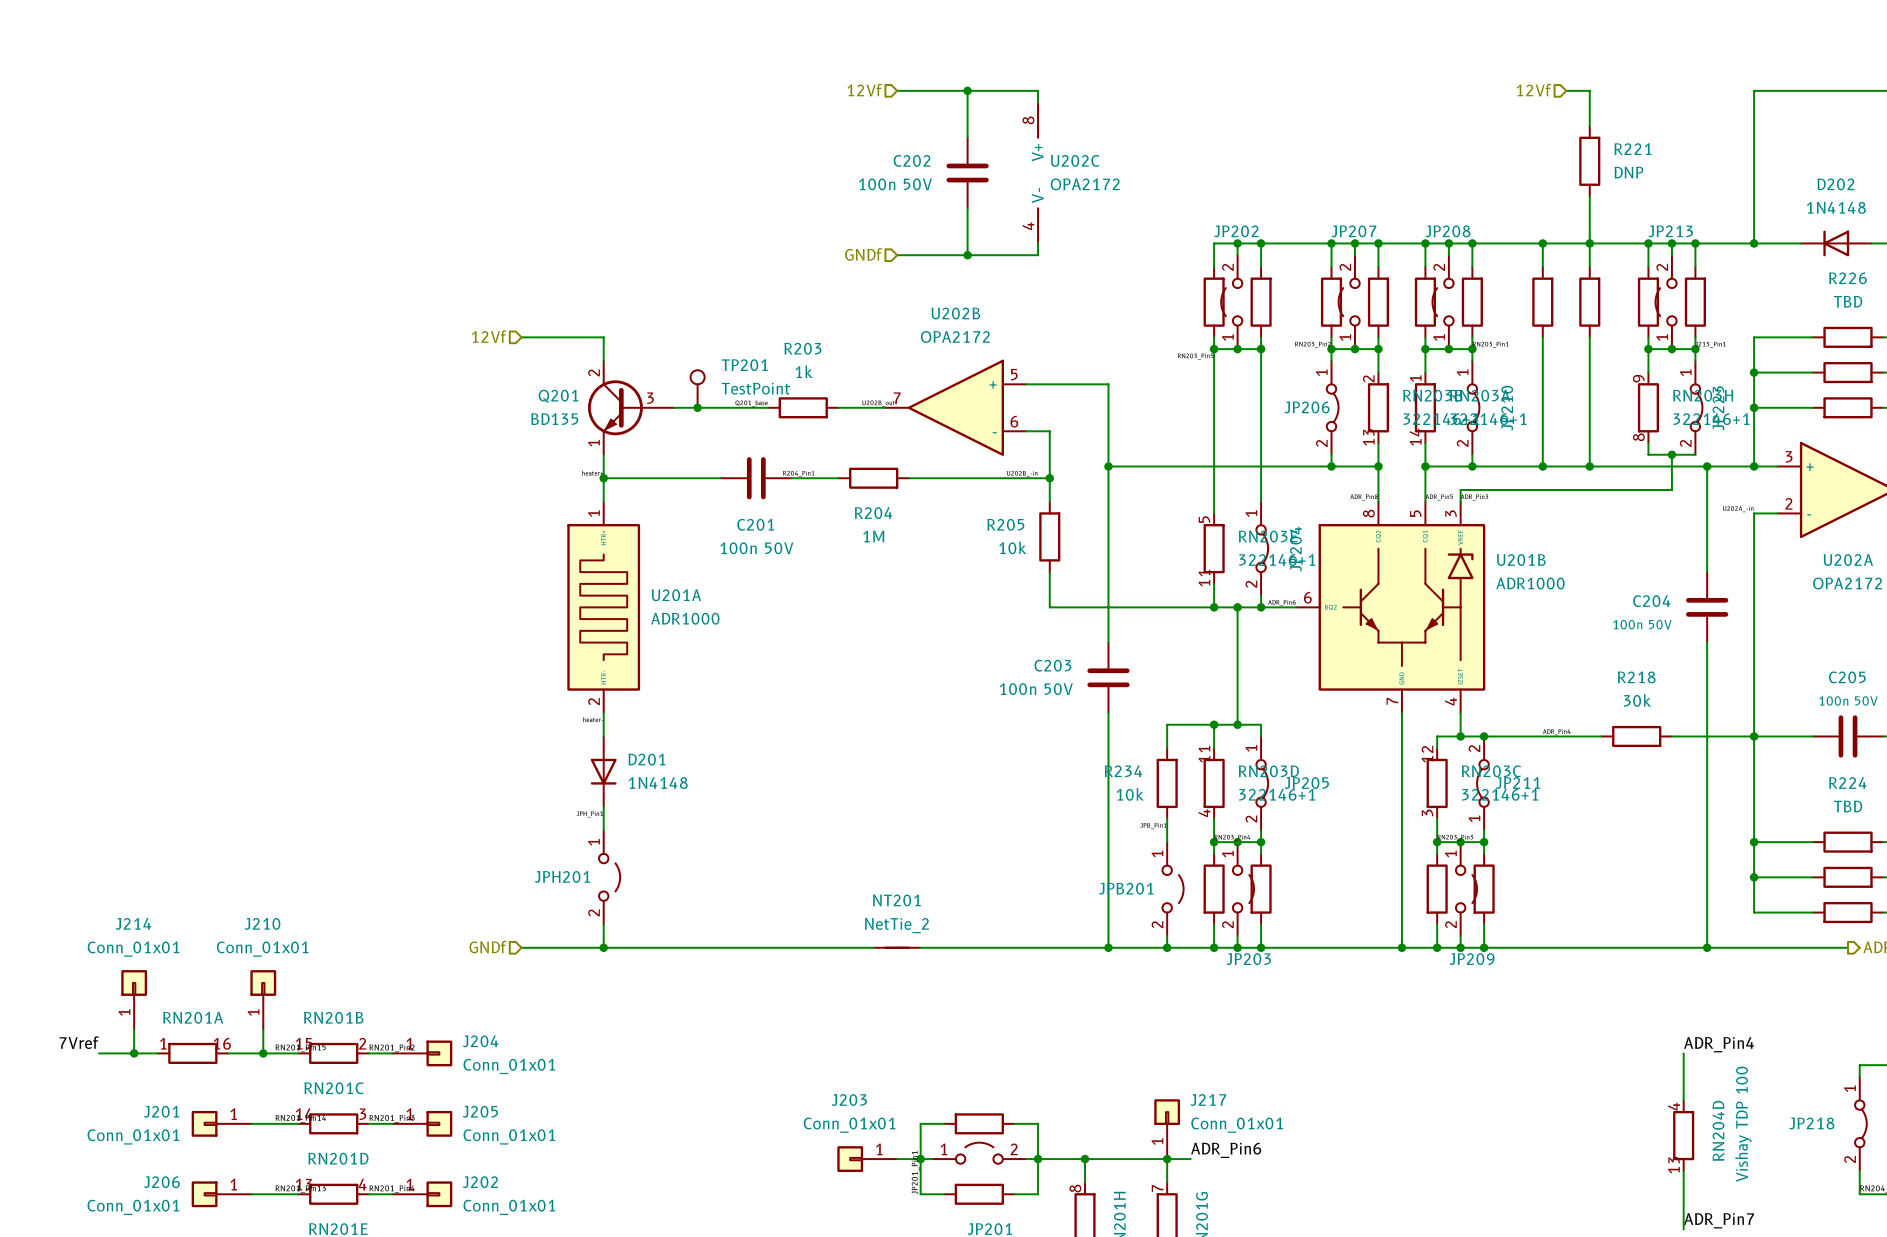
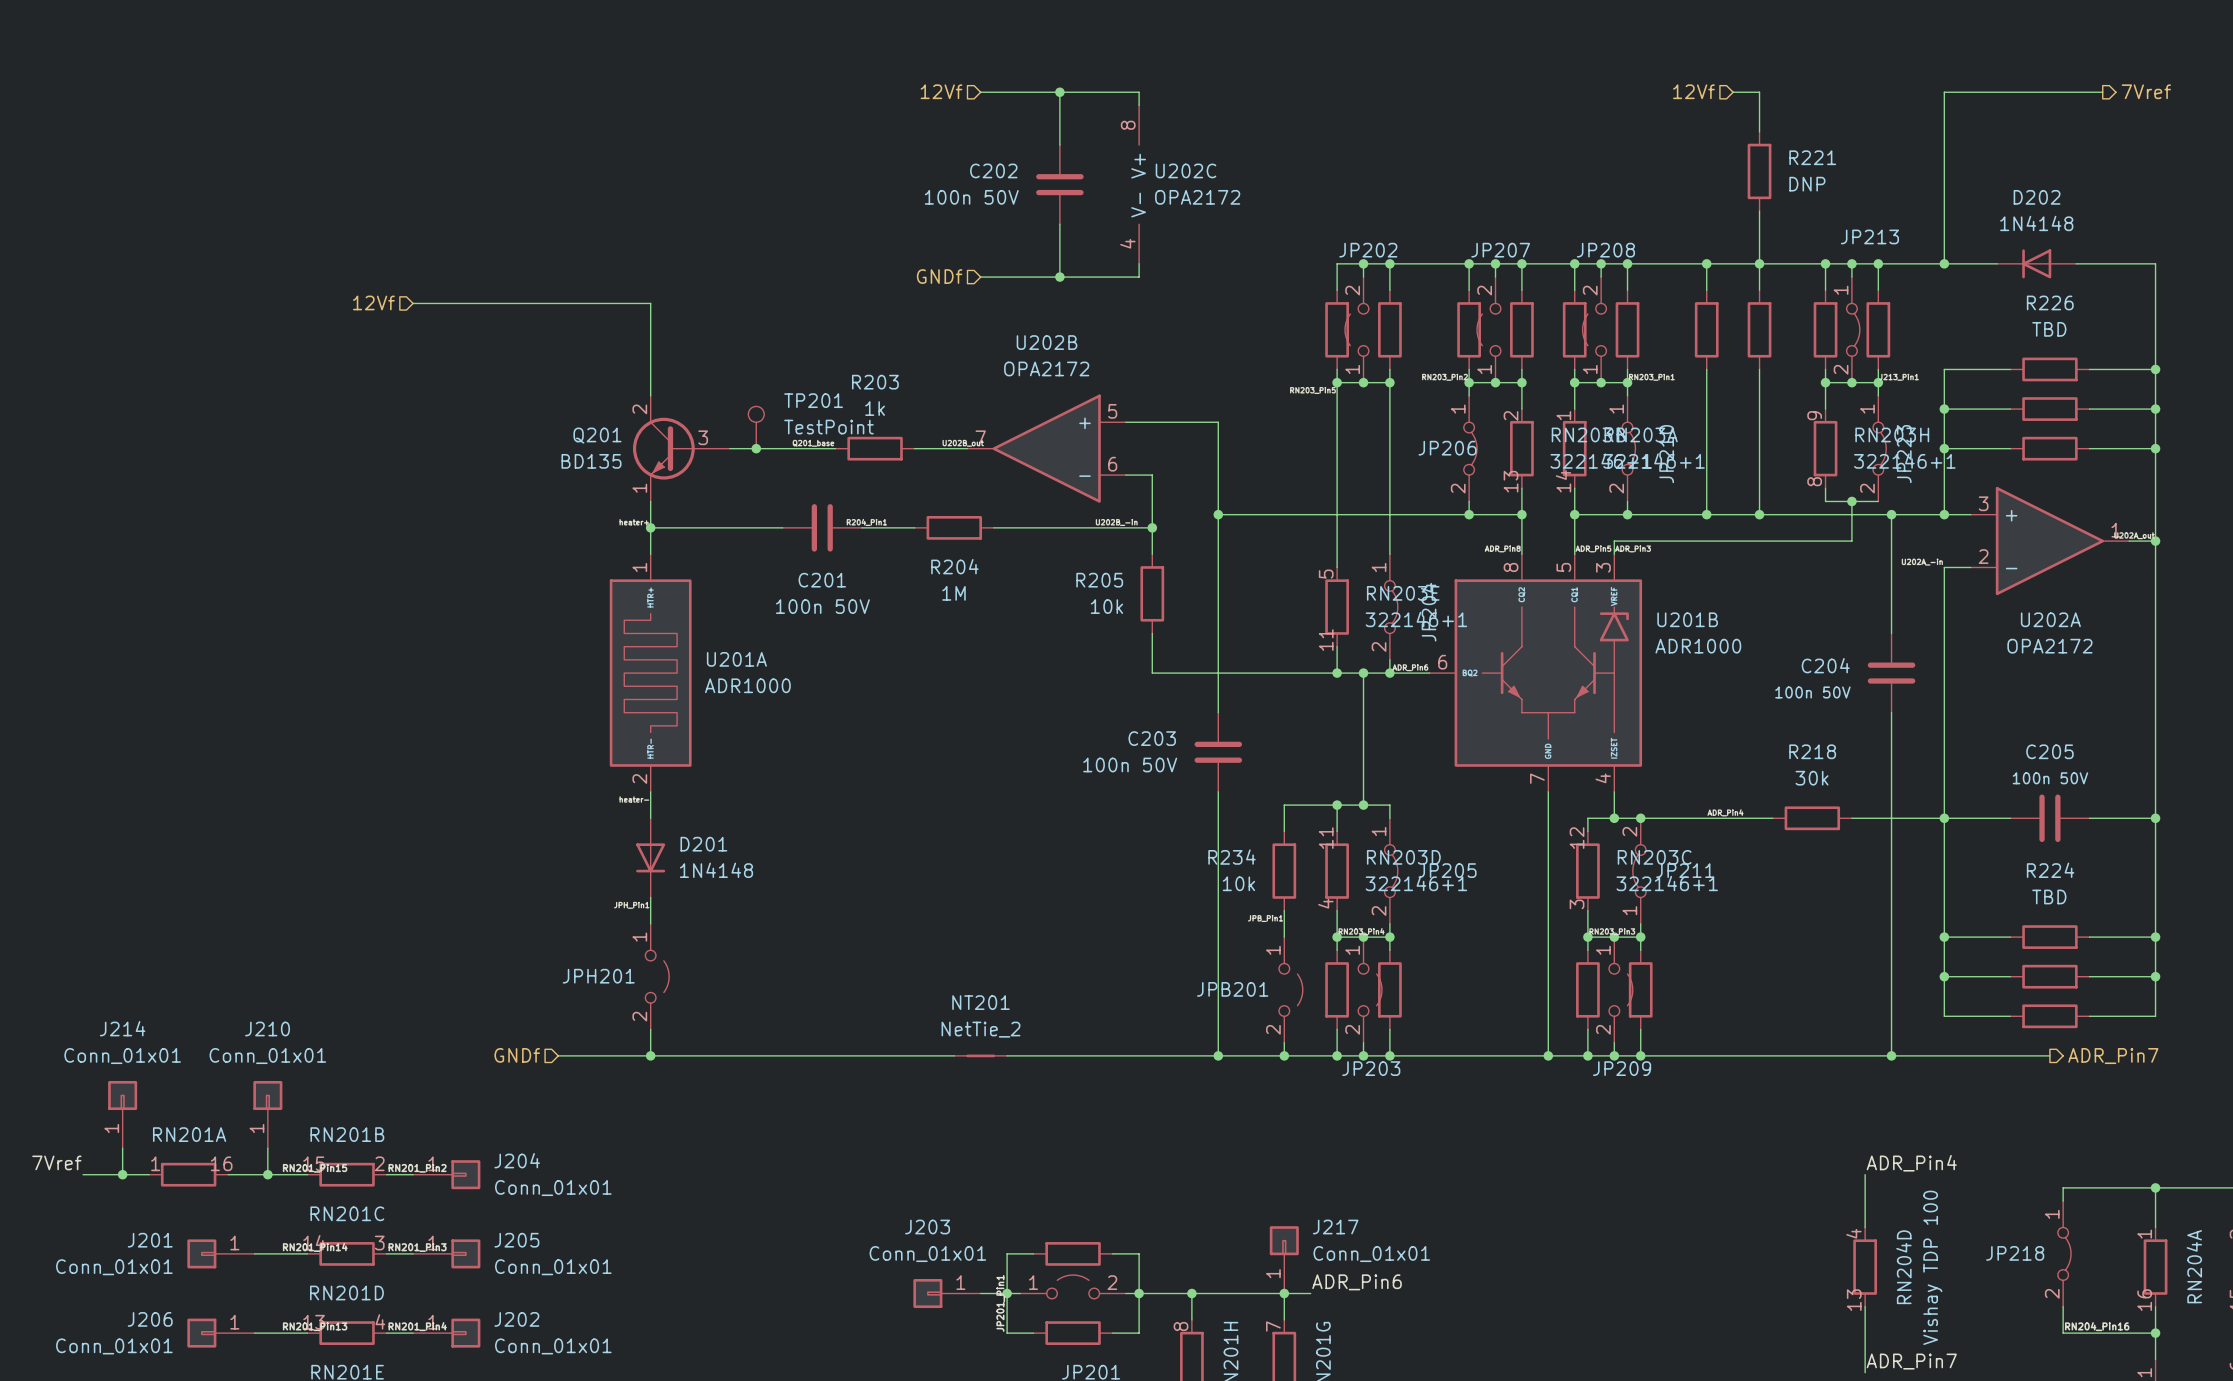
JP213 symbol: [1655, 255, 1677, 350] -> [1846, 277, 1860, 383]
hierarchical label position: 12Vf (489, 336) -> 12Vf (373, 302)
wire: (521, 337) (603, 337) -> (413, 303) (650, 303) (650, 369)

